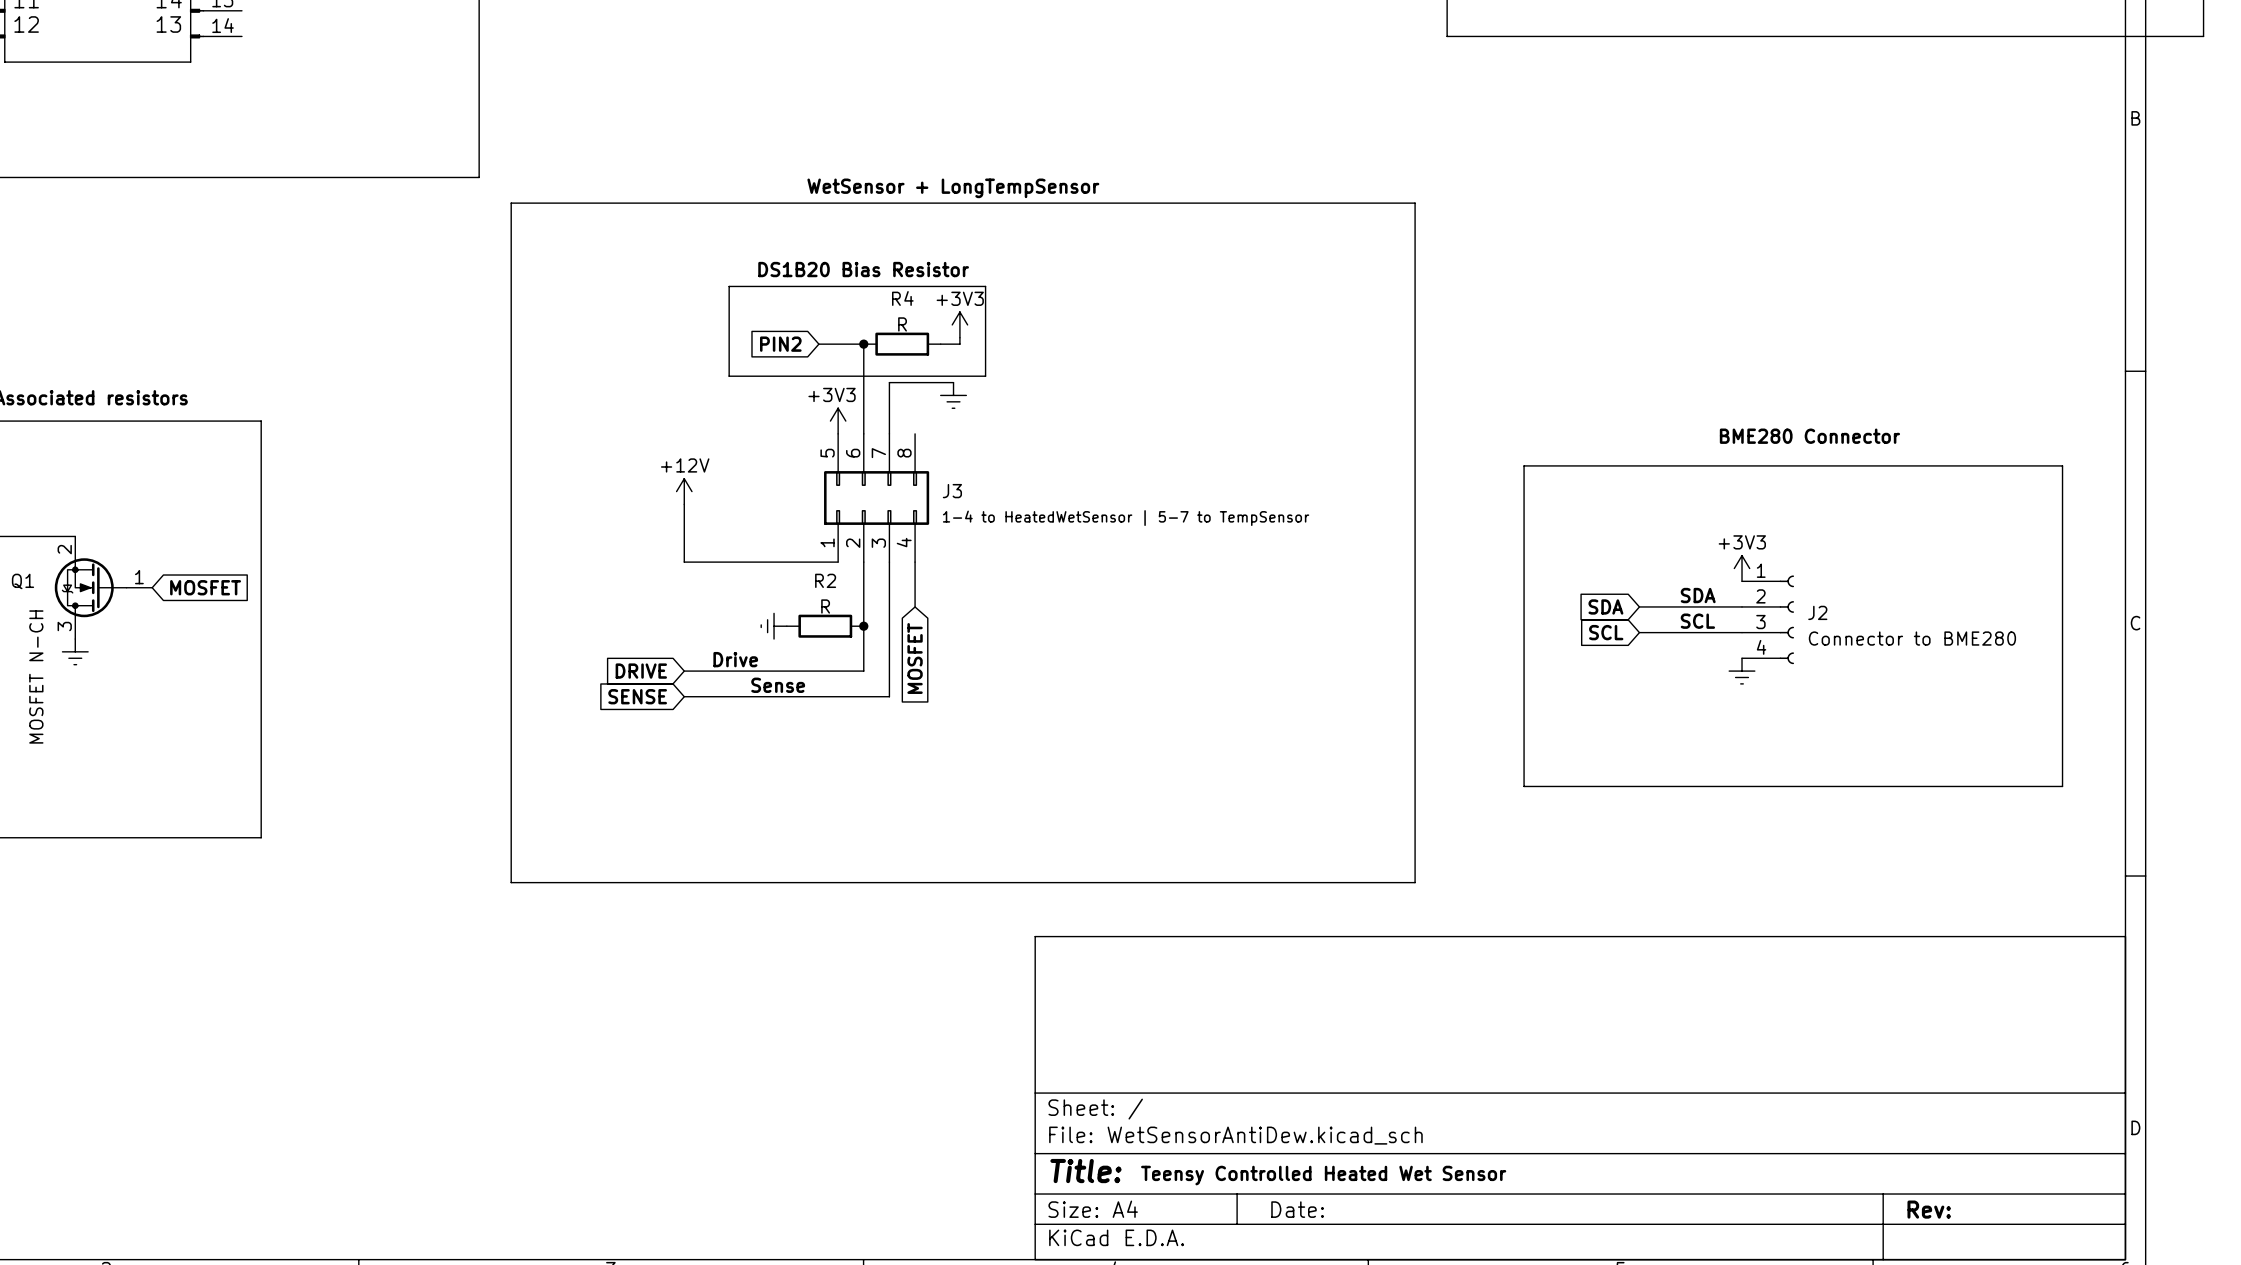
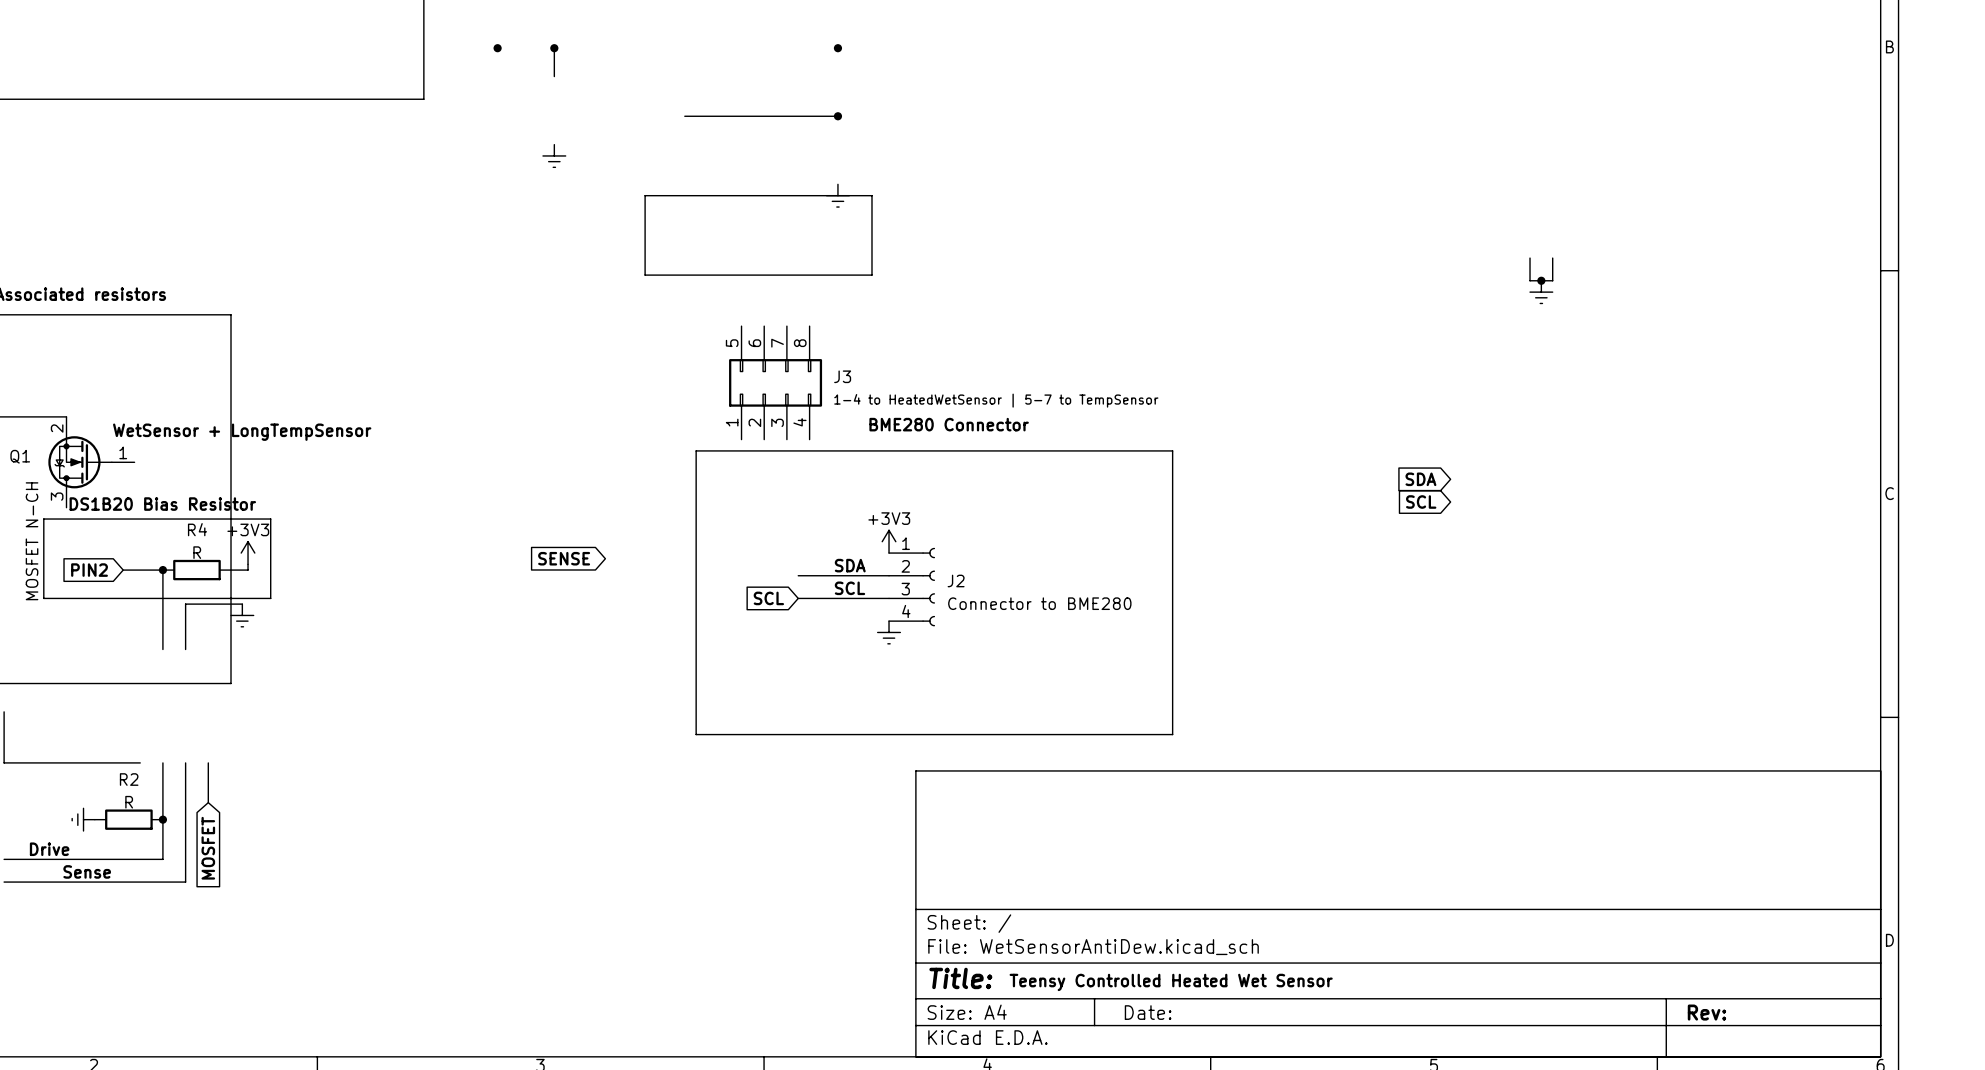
junction: none -> (497, 48)
wire: none -> (554, 48) (554, 76)
junction: none -> (554, 48)
junction: none -> (837, 48)
text: WetSensor + LongTempSensor (953, 188) -> none
wire: none -> (684, 116) (837, 116)
junction: none -> (837, 116)
line: (511, 203) (1415, 203) (1415, 882) (511, 882) (511, 203) -> none
power symbol: none -> (554, 155)
text: DS1B20 Bias Resistor (863, 269) -> none
power symbol: +3V3 (959, 324) -> none
wire: (959, 337) (959, 344) (940, 344) -> none
global label: PIN2 (780, 344) -> none
wire: (818, 344) (863, 344) (863, 433) -> none
junction: (863, 344) -> none
R4 position: (902, 344) -> (196, 570)
wire: none -> (1530, 258) (1530, 280) (1552, 280) (1552, 258)
wire: (953, 382) (889, 382) (889, 433) -> none
junction: none -> (1541, 280)
power symbol position: (953, 395) -> (837, 195)
power symbol: none -> (1541, 292)
power symbol: +3V3 (838, 421) -> none
text: BME280 Connector (1809, 436) -> none
line: (1524, 465) (2062, 465) (2062, 786) (1524, 786) (1524, 465) -> none
power symbol: +12V (684, 491) -> none
wire: (684, 504) (684, 562) (838, 562) -> none
text: none -> BME280 Connector (949, 424)
text: none -> WetSensor + LongTempSensor (242, 432)
wire: (863, 562) (863, 671) (684, 671) -> none
wire: (889, 562) (889, 696) (684, 696) -> none
wire: (915, 562) (915, 606) -> none
power symbol: +3V3 (1742, 568) -> none
line: none -> (696, 450) (1172, 450) (1172, 734) (696, 734) (696, 450)
global label: MOSFET (205, 587) -> none
label: SDA (1698, 595) -> none
wire: (1639, 606) (1742, 606) -> none
J2 position: (1768, 619) -> (912, 587)
label: SCL (1697, 621) -> none
power symbol: (774, 626) -> none
R2 position: (825, 626) -> (128, 819)
junction: (863, 626) -> none
wire: (1639, 632) (1742, 632) -> none
text: none -> DS1B20 Bias Resistor (162, 504)
line: none -> (43, 519) (270, 519) (270, 598) (43, 598) (43, 519)
power symbol: (75, 651) -> none
global label: MOSFET (915, 658) -> none
label: Drive (735, 659) -> none
global label: DRIVE (641, 671) -> none
power symbol: (1742, 671) -> none
power symbol: none -> +3V3 (889, 541)
label: Sense (778, 685) -> none
power symbol: none -> +3V3 (248, 553)
wire: none -> (248, 564) (248, 570) (231, 570)
label: none -> SDA (850, 565)
global label: none -> PIN2 (89, 570)
wire: none -> (123, 570) (162, 570) (162, 649)
junction: none -> (162, 570)
wire: none -> (798, 575) (889, 575)
label: none -> SCL (849, 588)
global label: none -> SCL (768, 598)
wire: none -> (798, 598) (889, 598)
wire: none -> (242, 604) (185, 604) (185, 649)
power symbol: none -> (242, 615)
power symbol: none -> (889, 632)
wire: none -> (4, 711) (4, 762) (140, 762)
wire: none -> (162, 762) (162, 859) (4, 859)
wire: none -> (185, 762) (185, 882) (4, 882)
wire: none -> (208, 762) (208, 802)
power symbol: none -> (83, 819)
junction: none -> (162, 819)
global label: none -> MOSFET (208, 848)
label: none -> Drive (49, 849)
label: none -> Sense (87, 871)

